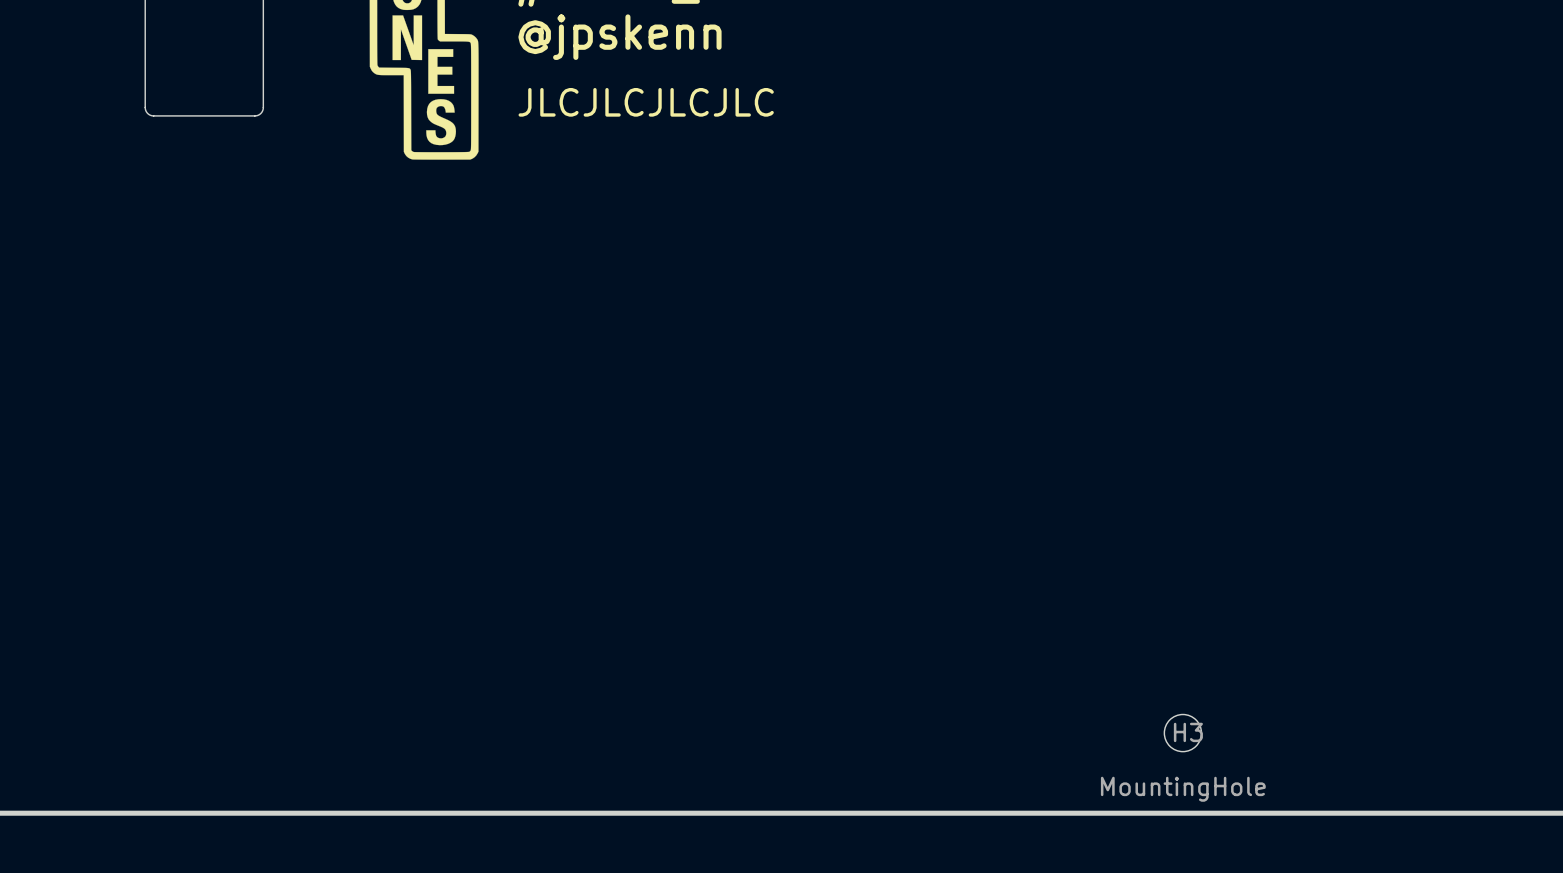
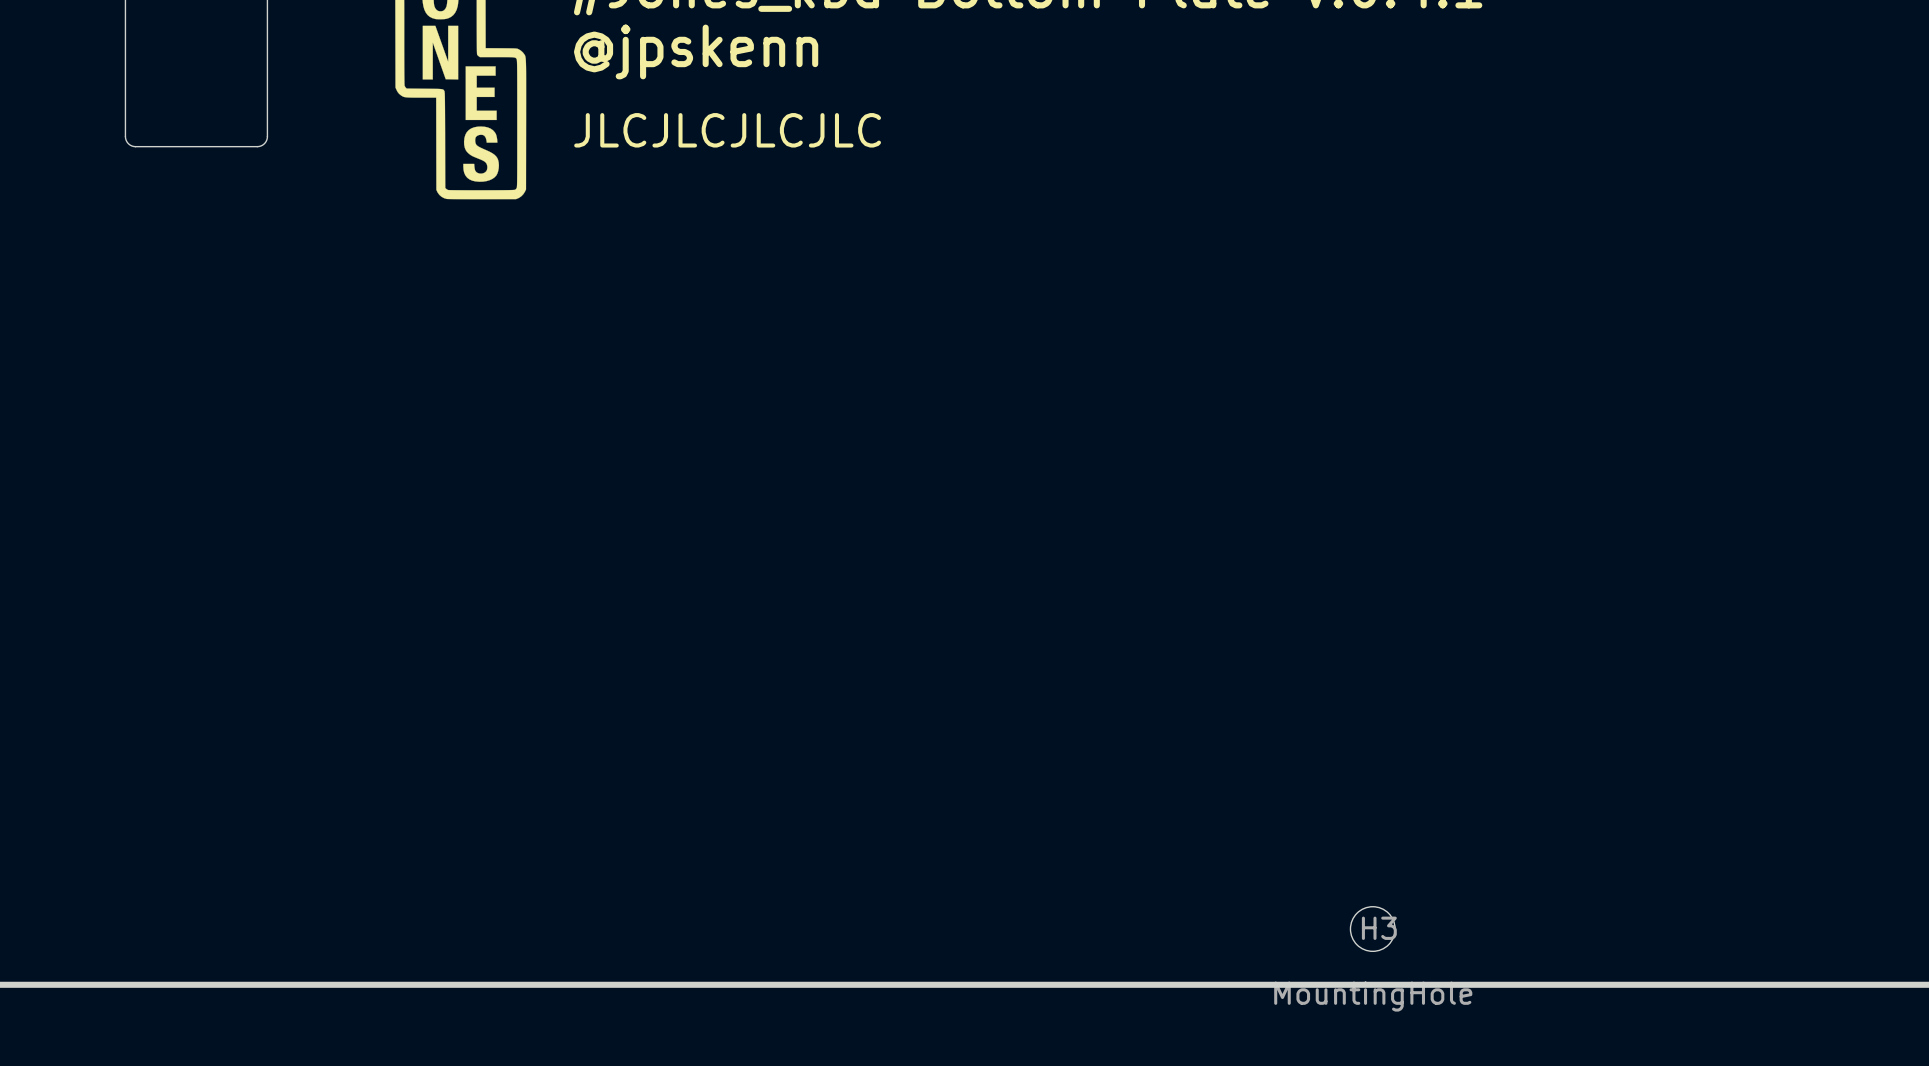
H3 position: (1182, 733) -> (1372, 929)

